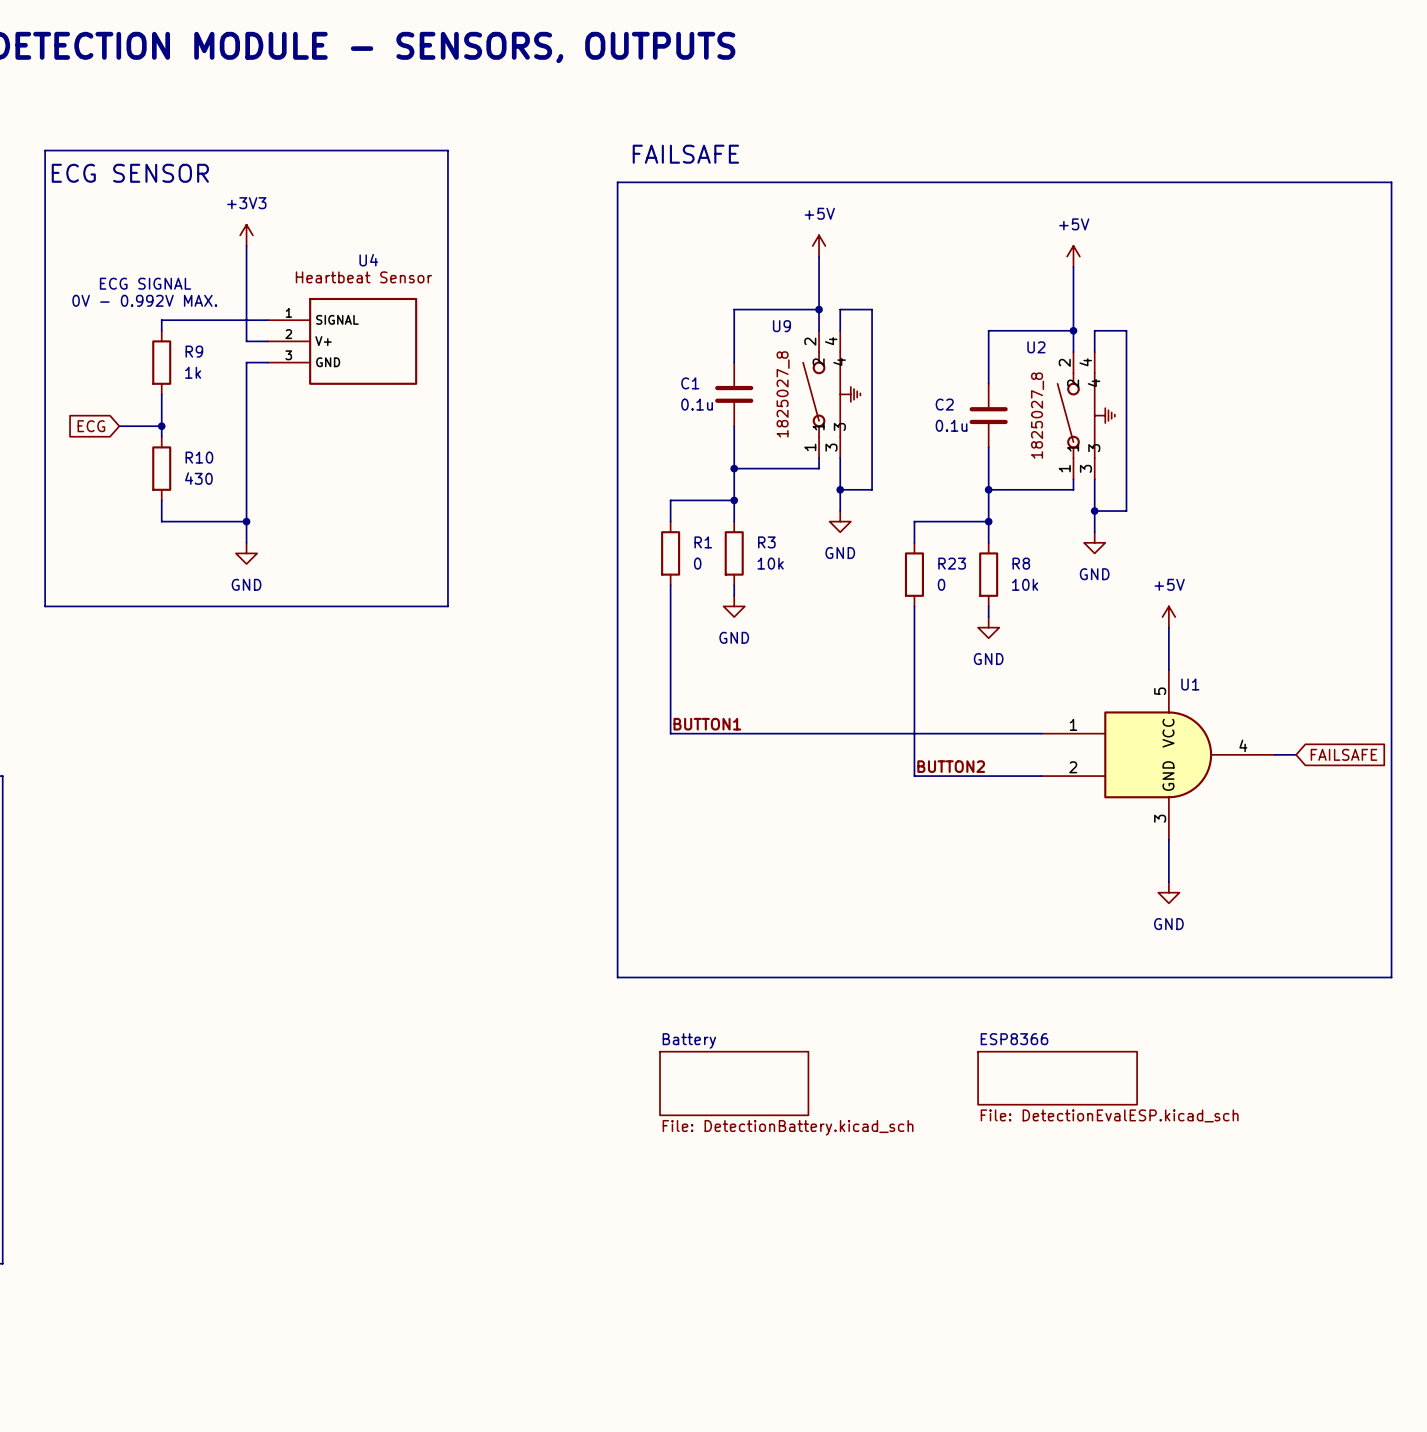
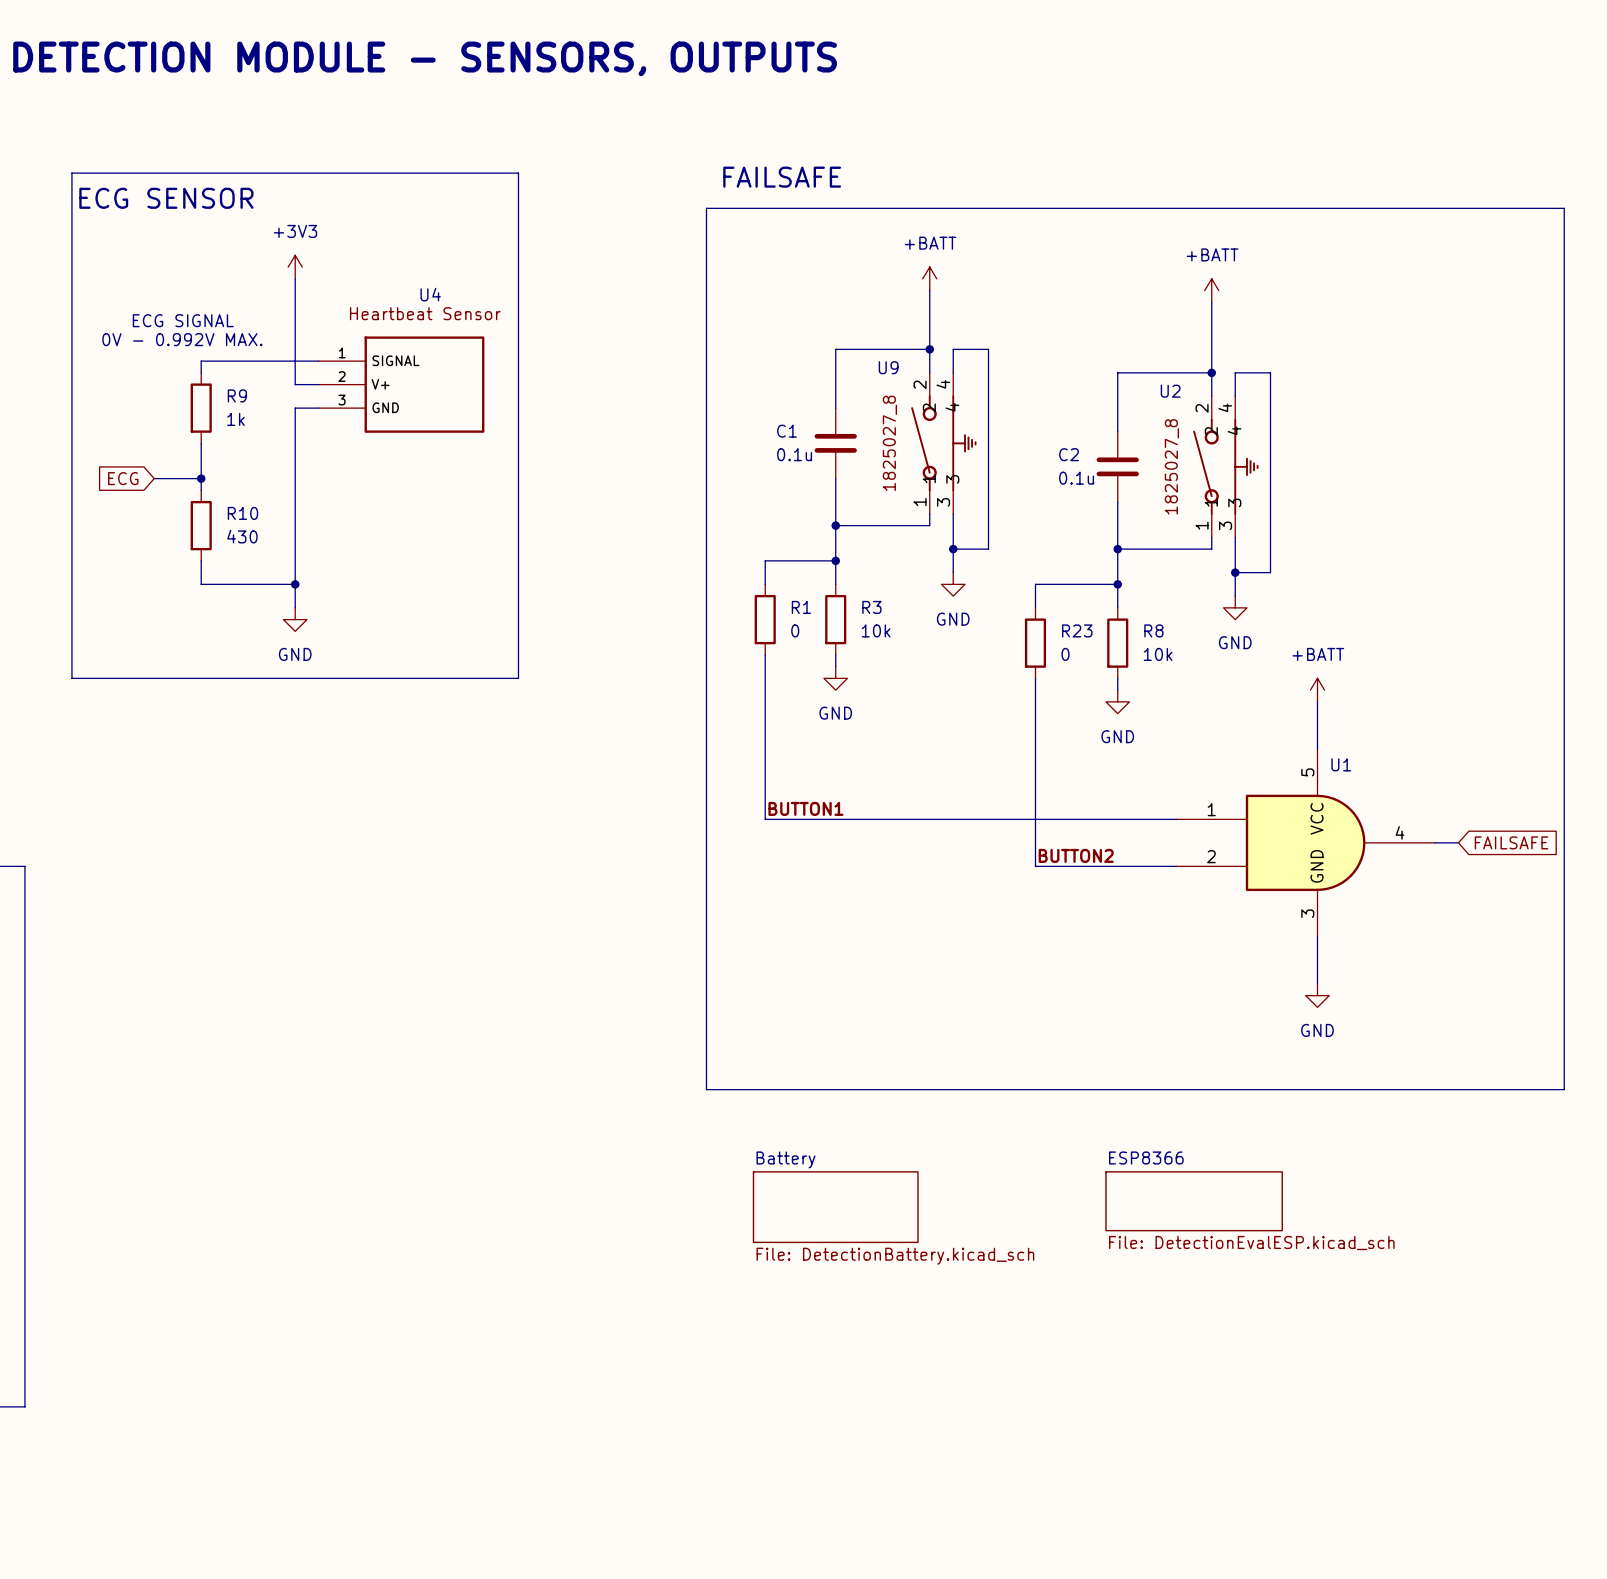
power symbol: +5V (819, 245) -> +BATT (929, 278)
power symbol: +5V (1073, 256) -> +BATT (1211, 290)
power symbol: +5V (1168, 617) -> +BATT (1317, 690)

